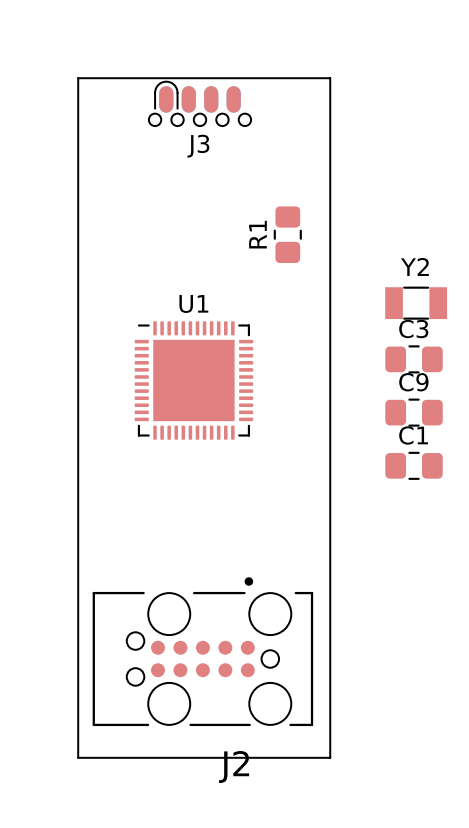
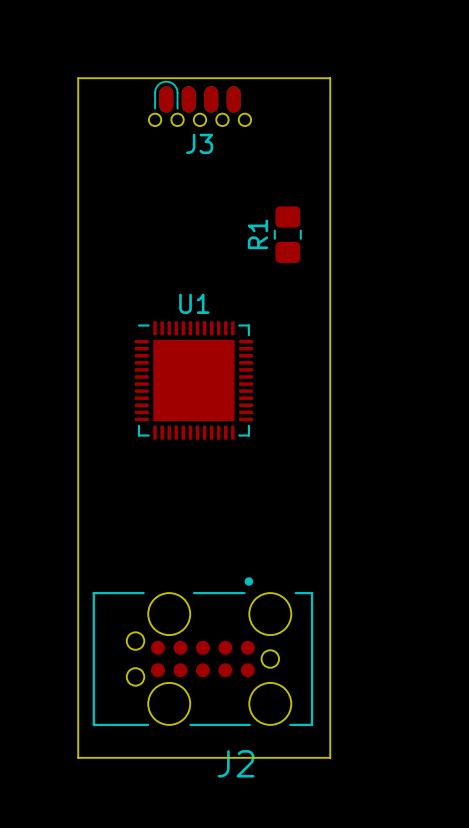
Y2: (416, 303) -> none
C3: (414, 359) -> none
C9: (414, 412) -> none
C1: (414, 465) -> none

